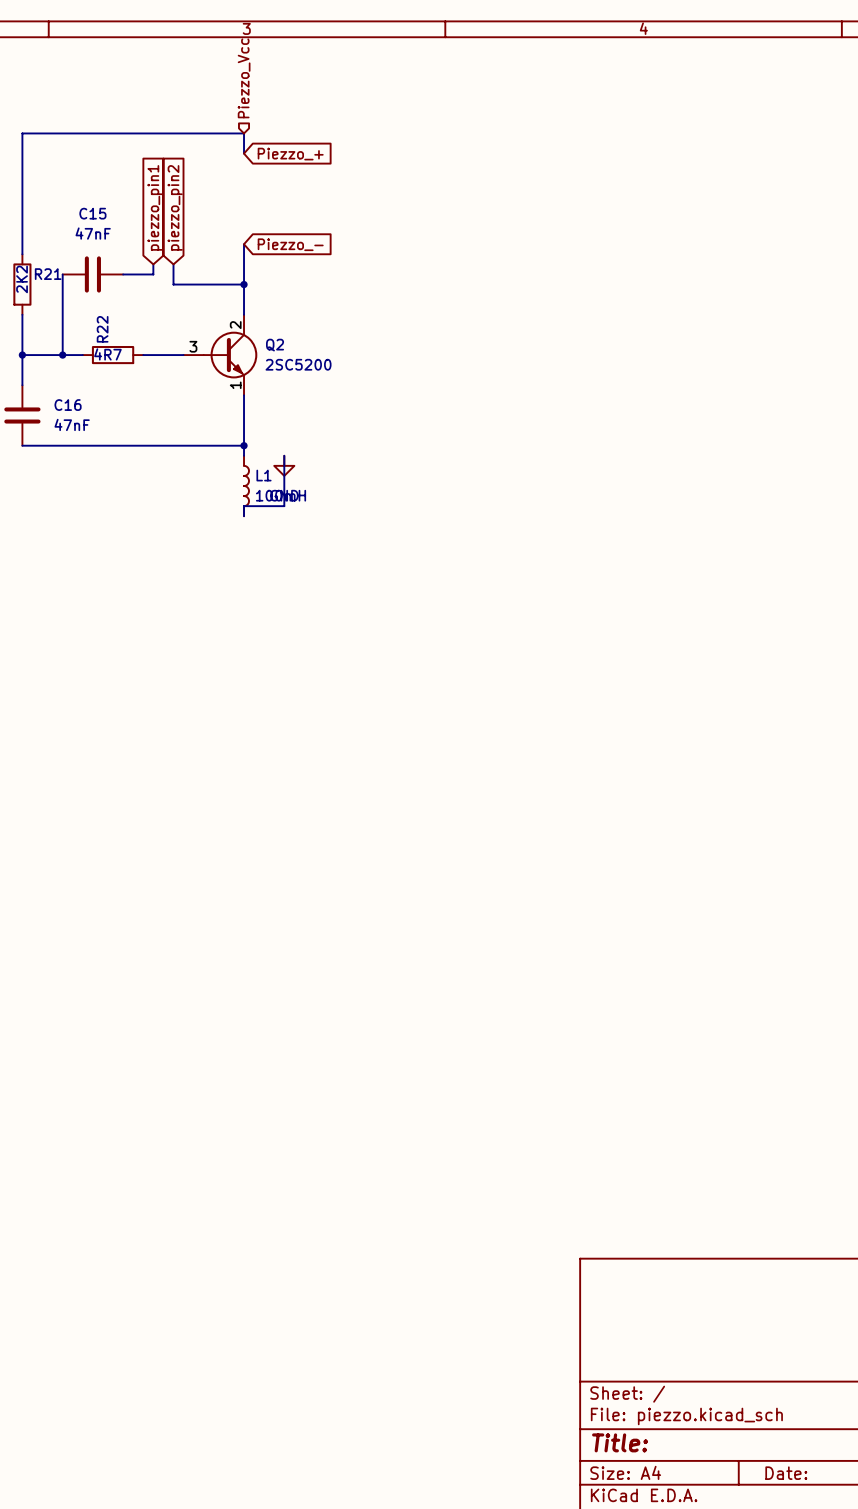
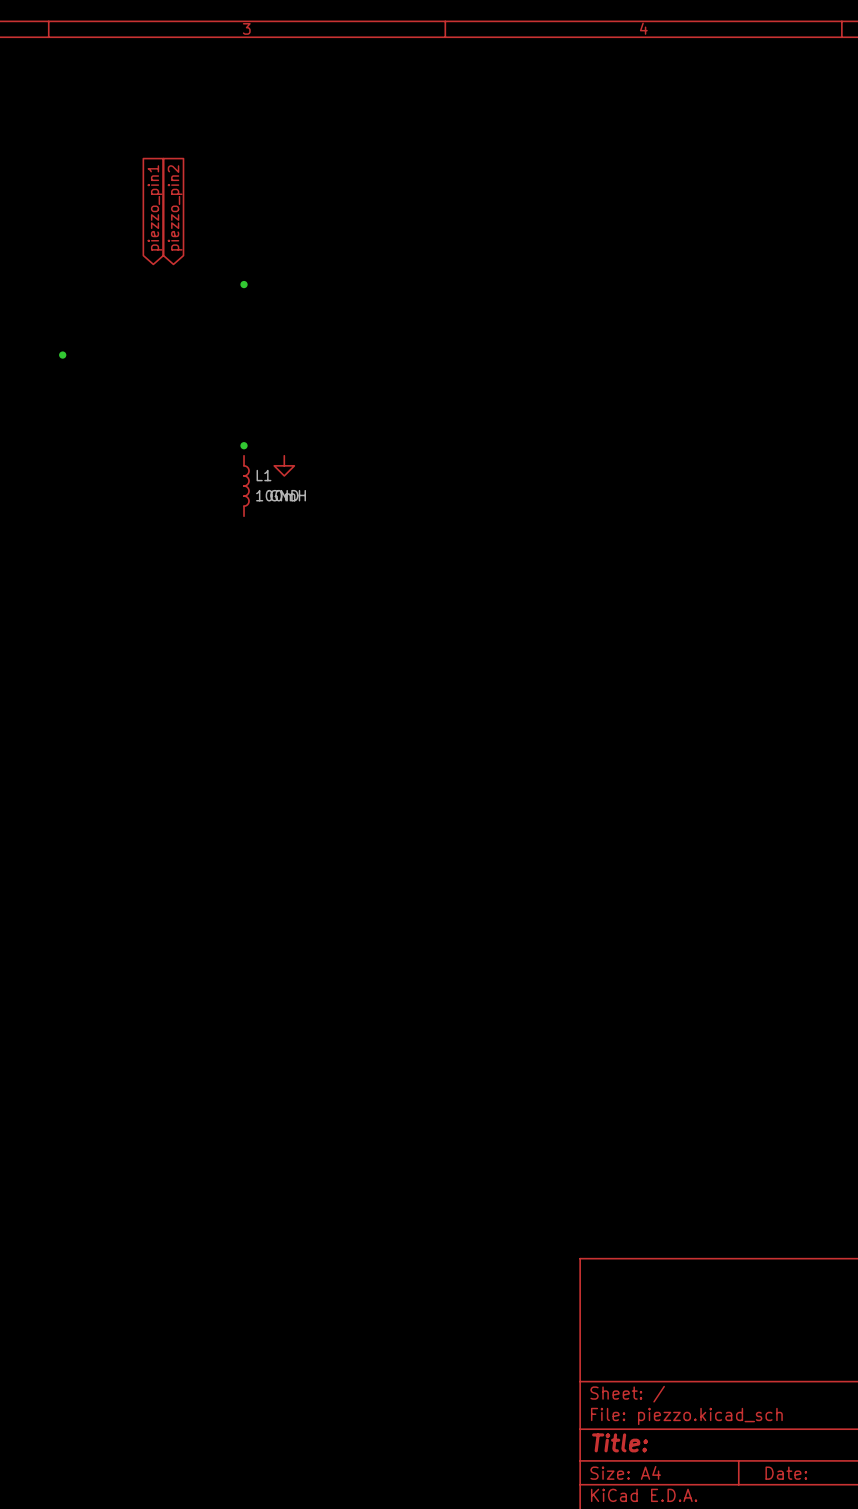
hierarchical label: Piezzo_Vcc (244, 78) -> none
wire: (244, 153) (244, 133) (22, 133) (22, 254) -> none
global label: Piezzo_+ (290, 154) -> none
wire: (244, 244) (244, 314) -> none
global label: Piezzo_- (290, 244) -> none
wire: (153, 264) (153, 274) (123, 274) -> none
wire: (173, 264) (173, 284) (244, 284) -> none
wire: (62, 274) (62, 355) -> none
C15: 47nF (92, 274) -> none
R21: 2K2 (22, 284) -> none
wire: (22, 314) (22, 385) -> none
wire: (22, 355) (82, 355) -> none
junction: (22, 355) -> none
R22: 4R7 (113, 355) -> none
wire: (143, 355) (183, 355) -> none
Q2: 2SC5200 (220, 355) -> none
wire: (244, 395) (244, 455) -> none
C16: 47nF (22, 415) -> none
wire: (22, 445) (244, 445) -> none
wire: (284, 455) (284, 506) (244, 506) (244, 516) -> none

